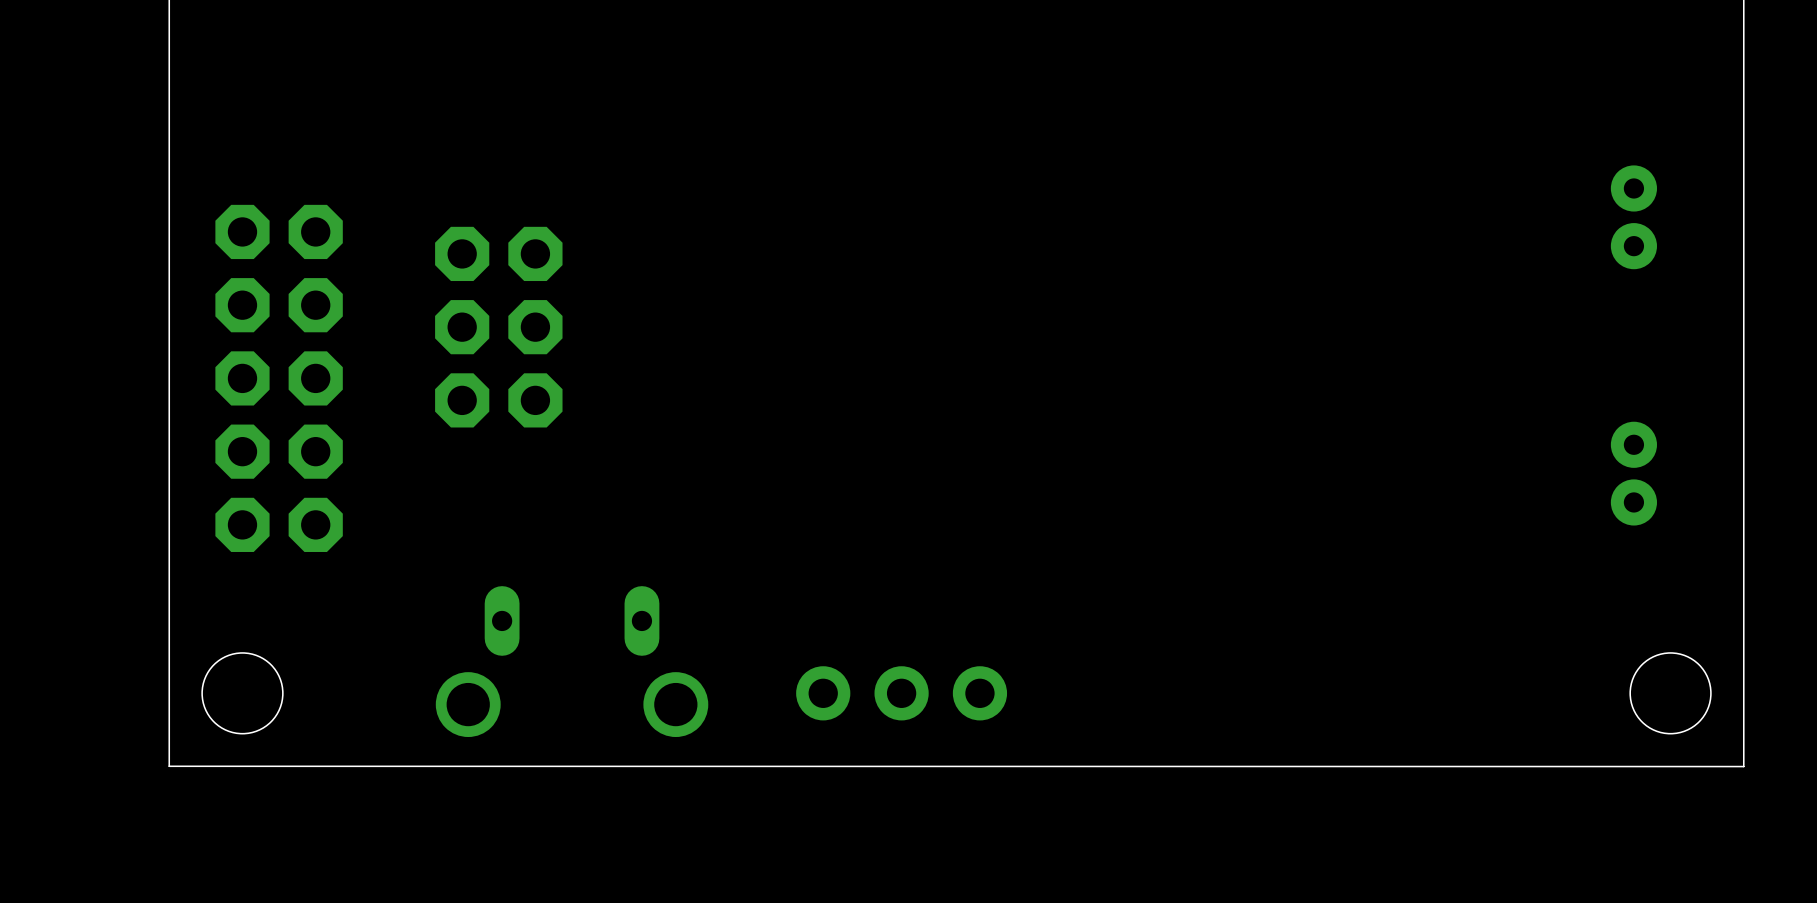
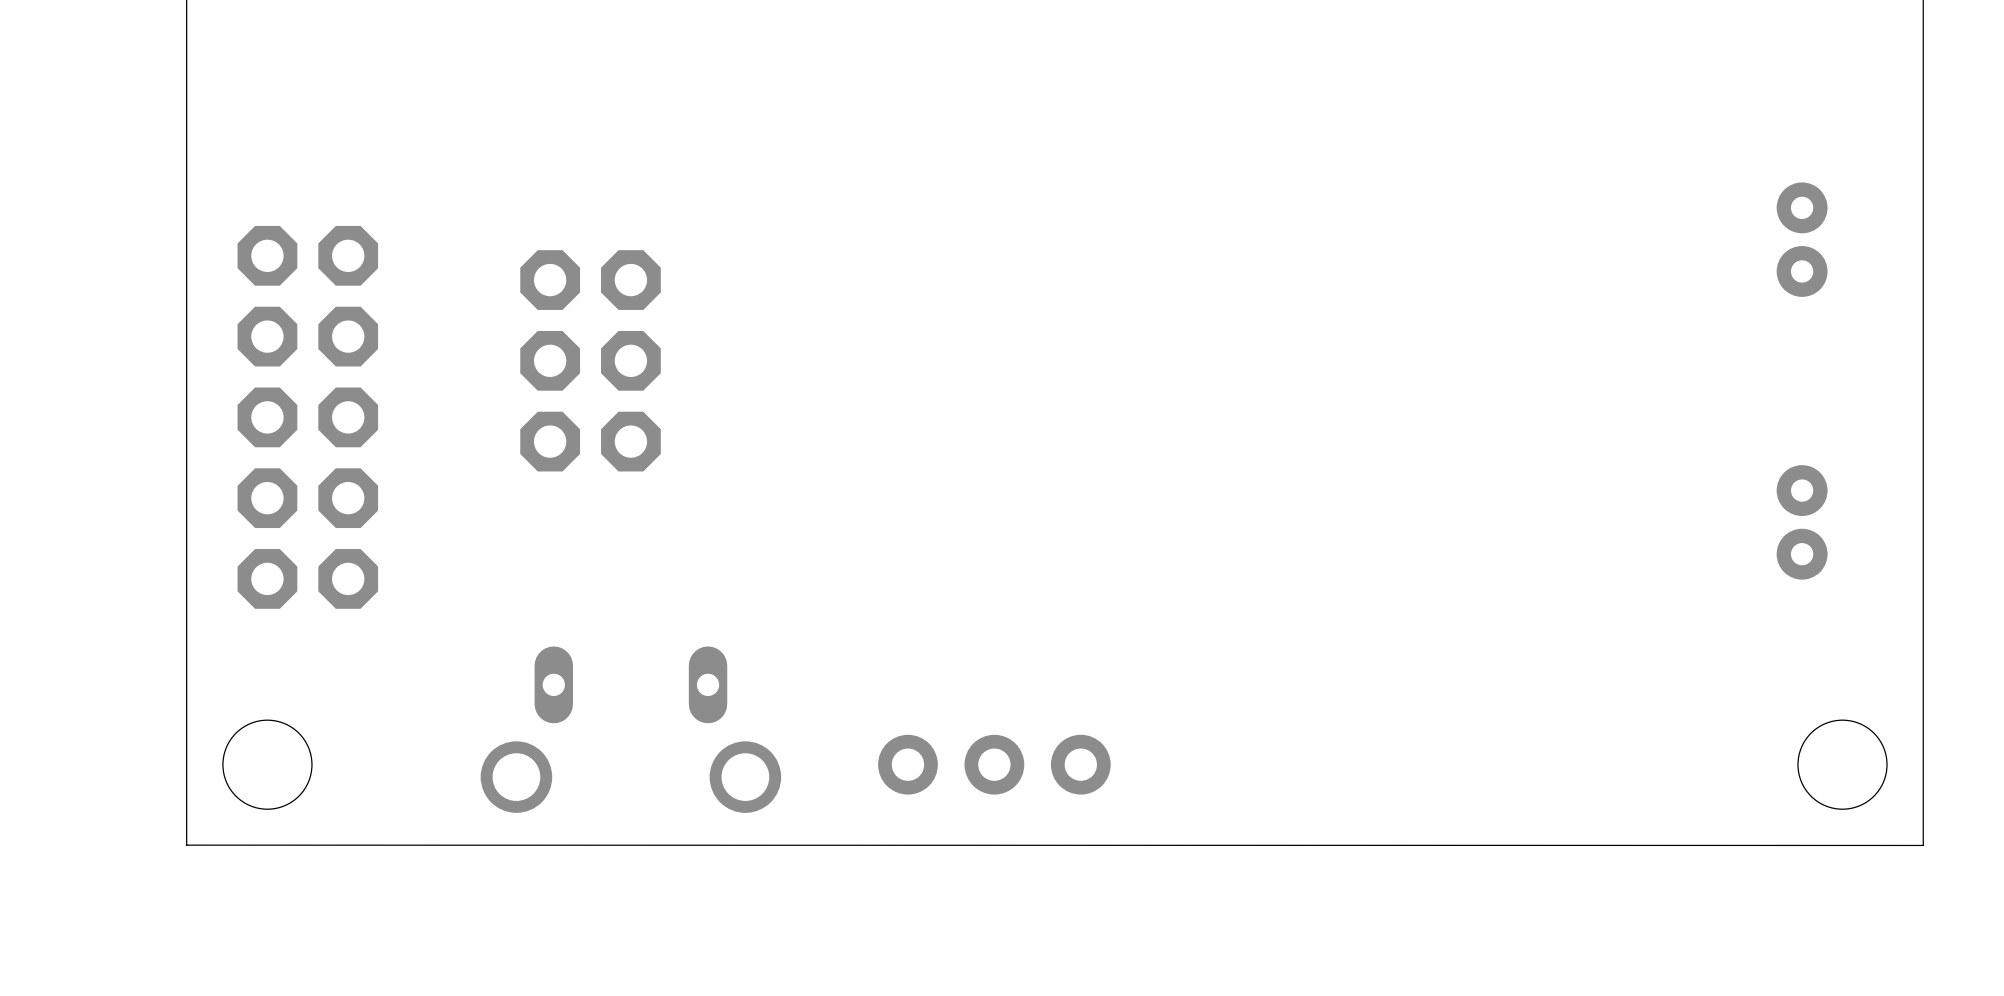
part position: (498, 327) -> (590, 360)

